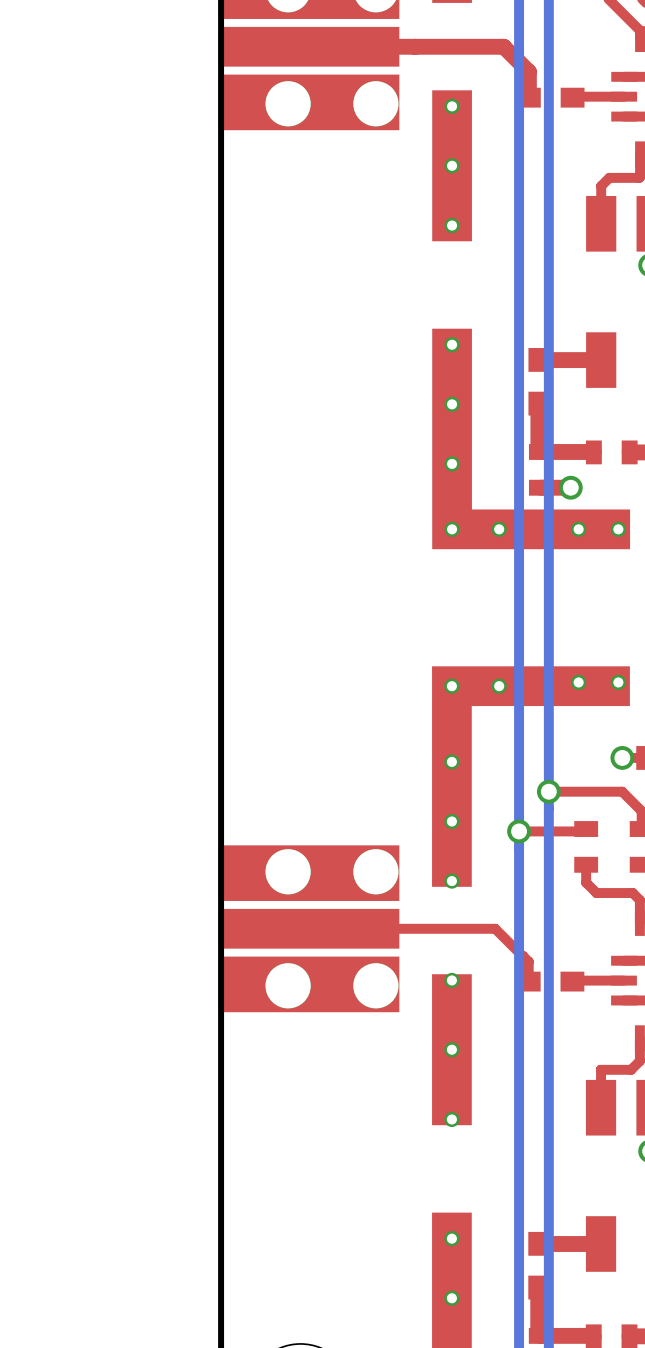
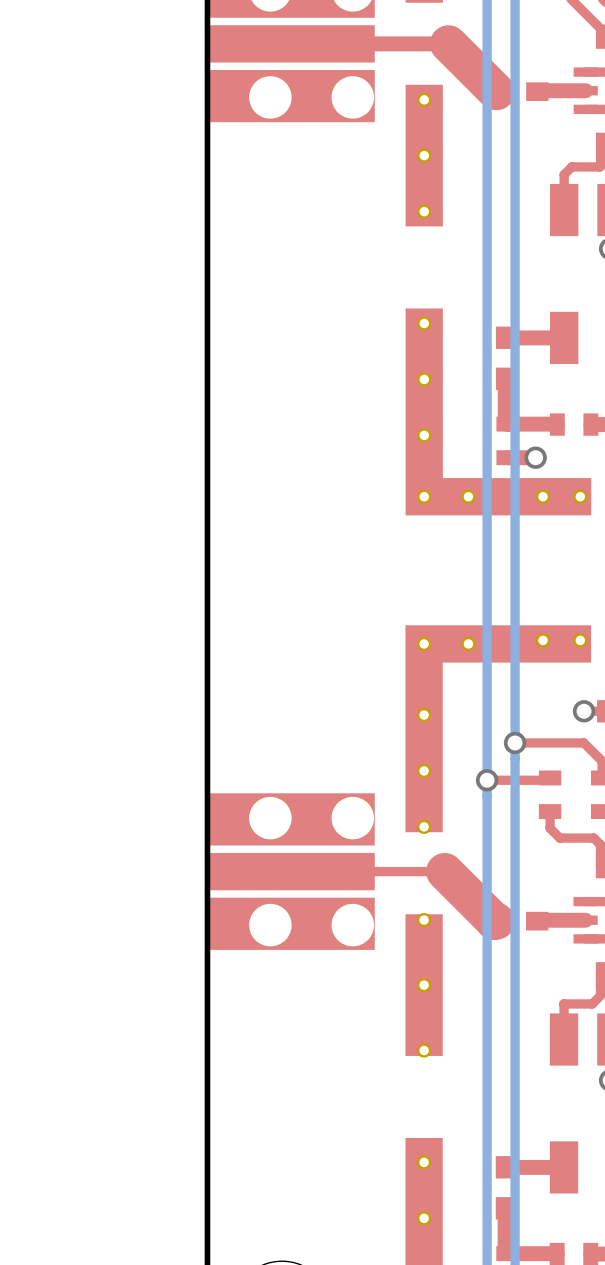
top track: (477, 46) (503, 46) (528, 71) (528, 97) -> (448, 43) (496, 91)
top track width: thin (624, 96) (572, 97) -> thick (585, 90) (537, 91)
top track: (473, 928) (495, 928) (522, 956) -> (444, 871) (496, 921)
top track: (523, 956) (528, 961) (528, 981) -> none
top track width: thin (624, 980) (572, 981) -> thick (585, 920) (537, 921)

